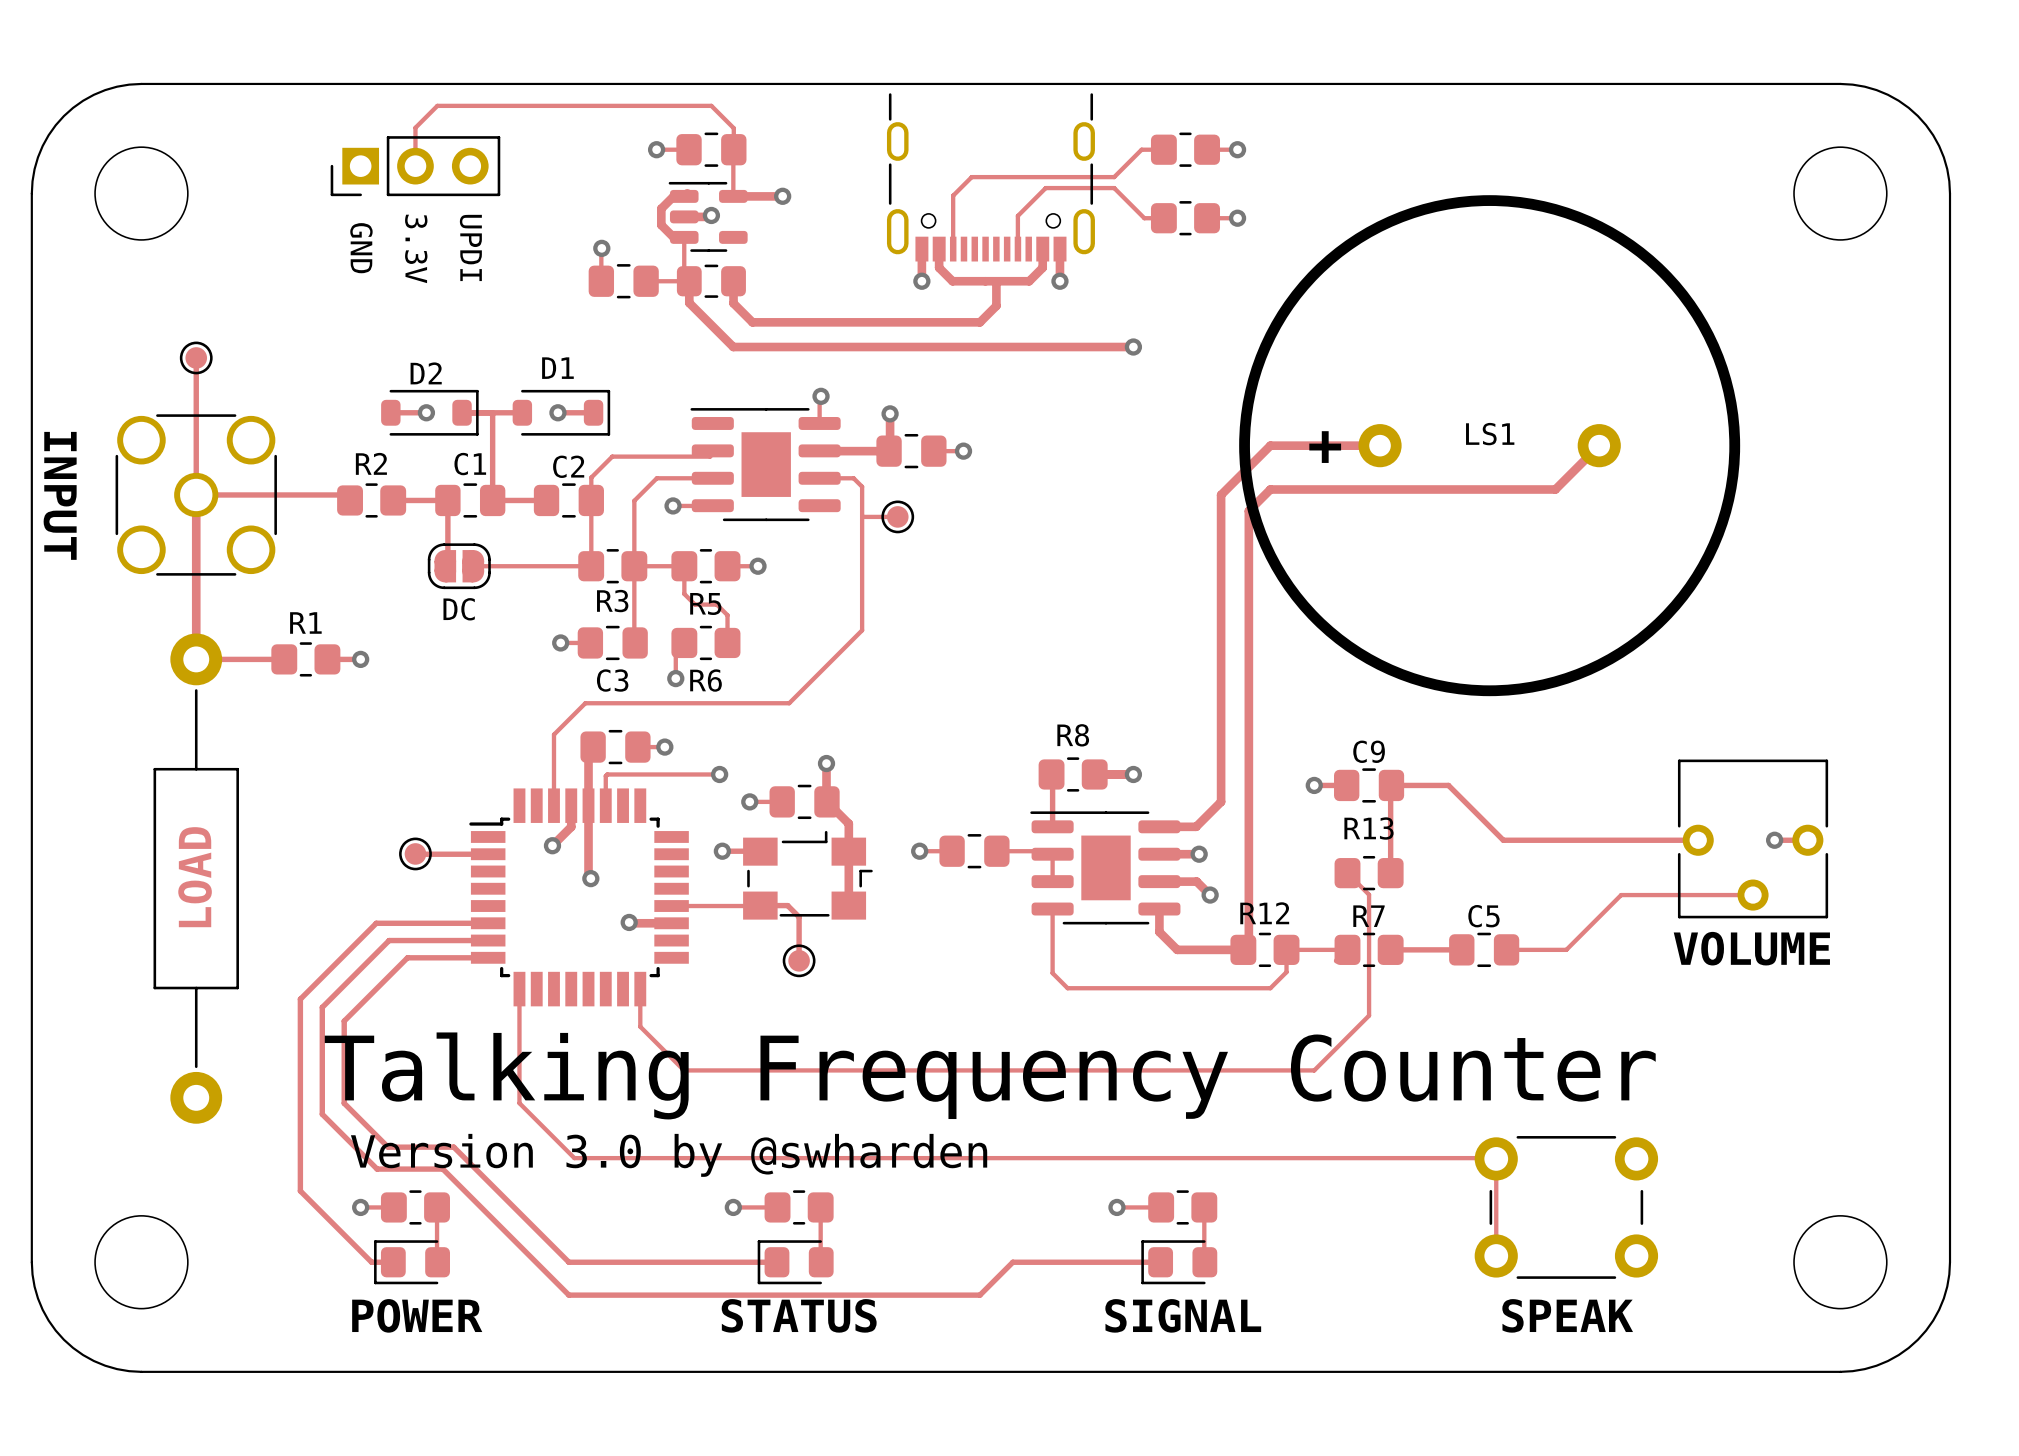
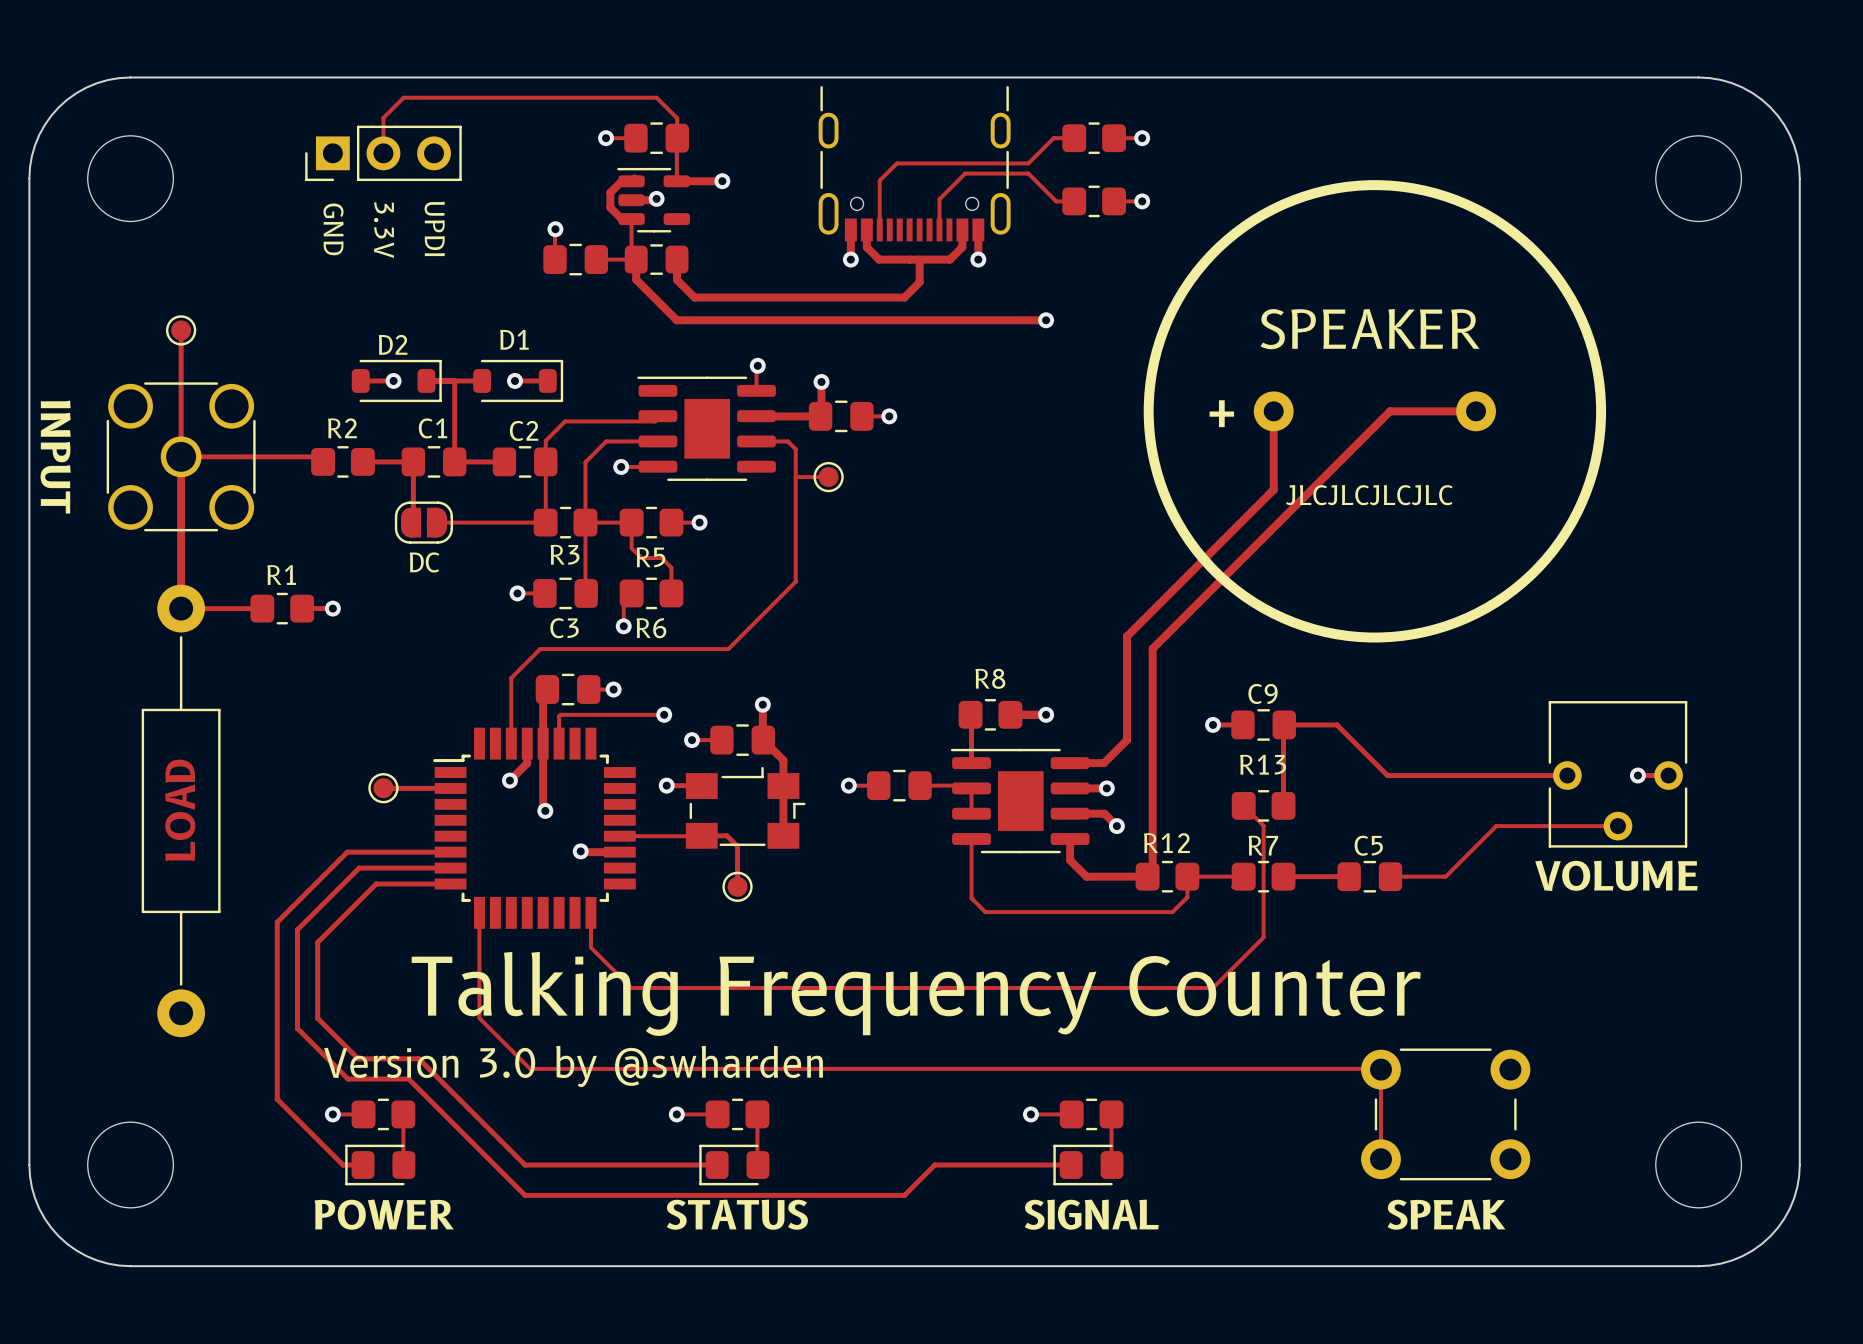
text: none -> SPEAKER (1370, 329)
LS1 name: LS1 (1490, 434) -> none
track: (1380, 445) (1270, 445) (1221, 494) (1221, 689) -> (1273, 411) (1273, 489) (1127, 636)
track: (1599, 445) (1555, 489) (1270, 489) (1248, 511) (1248, 702) -> (1476, 411) (1390, 411) (1152, 648)
text: none -> JLCJLCJLCJLC (1369, 495)

